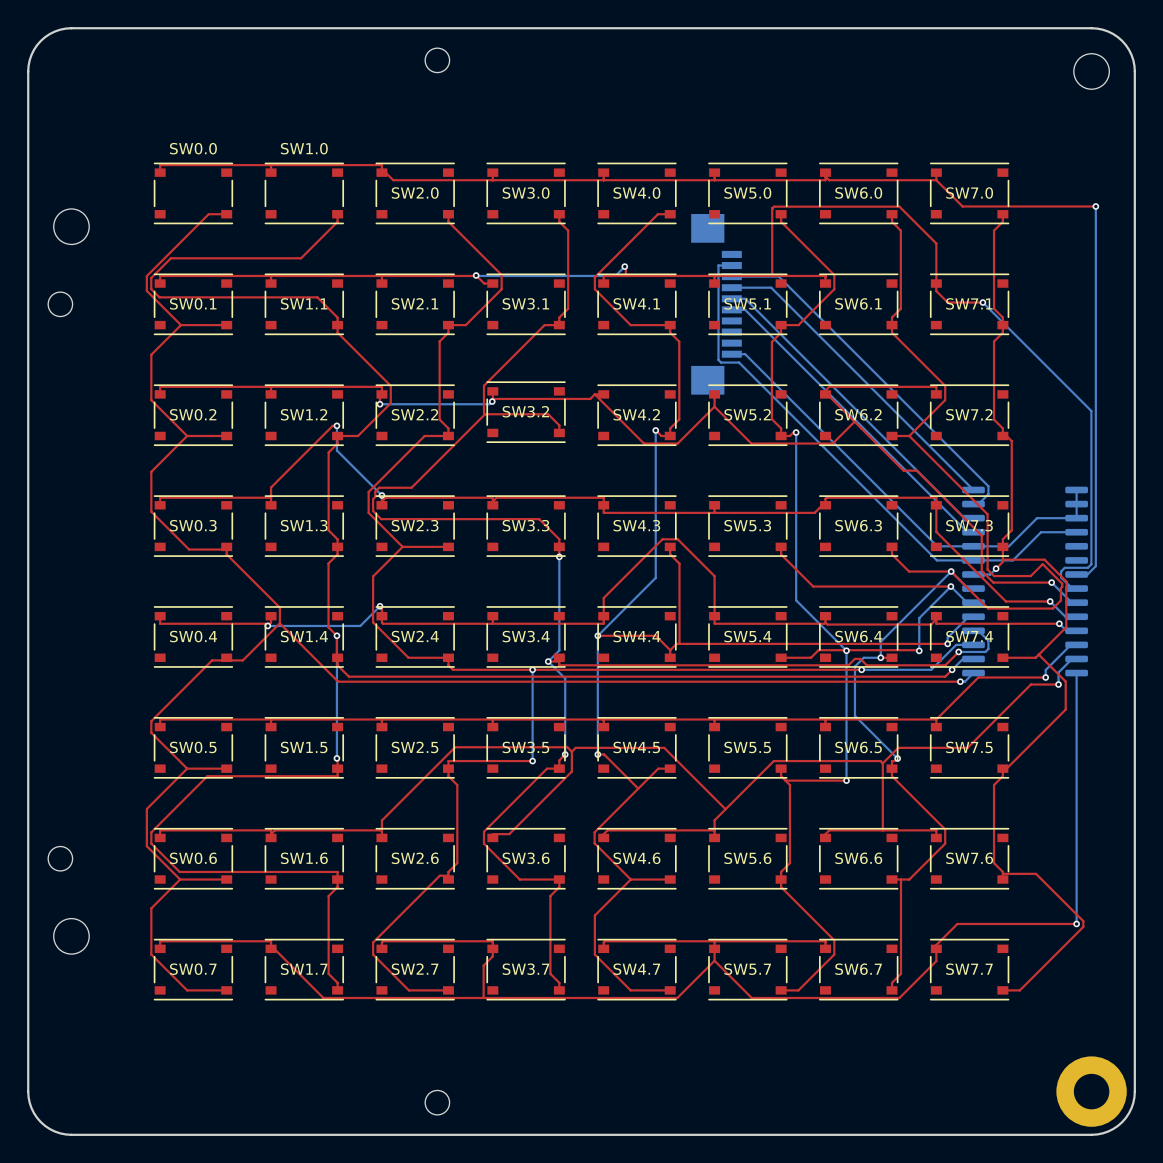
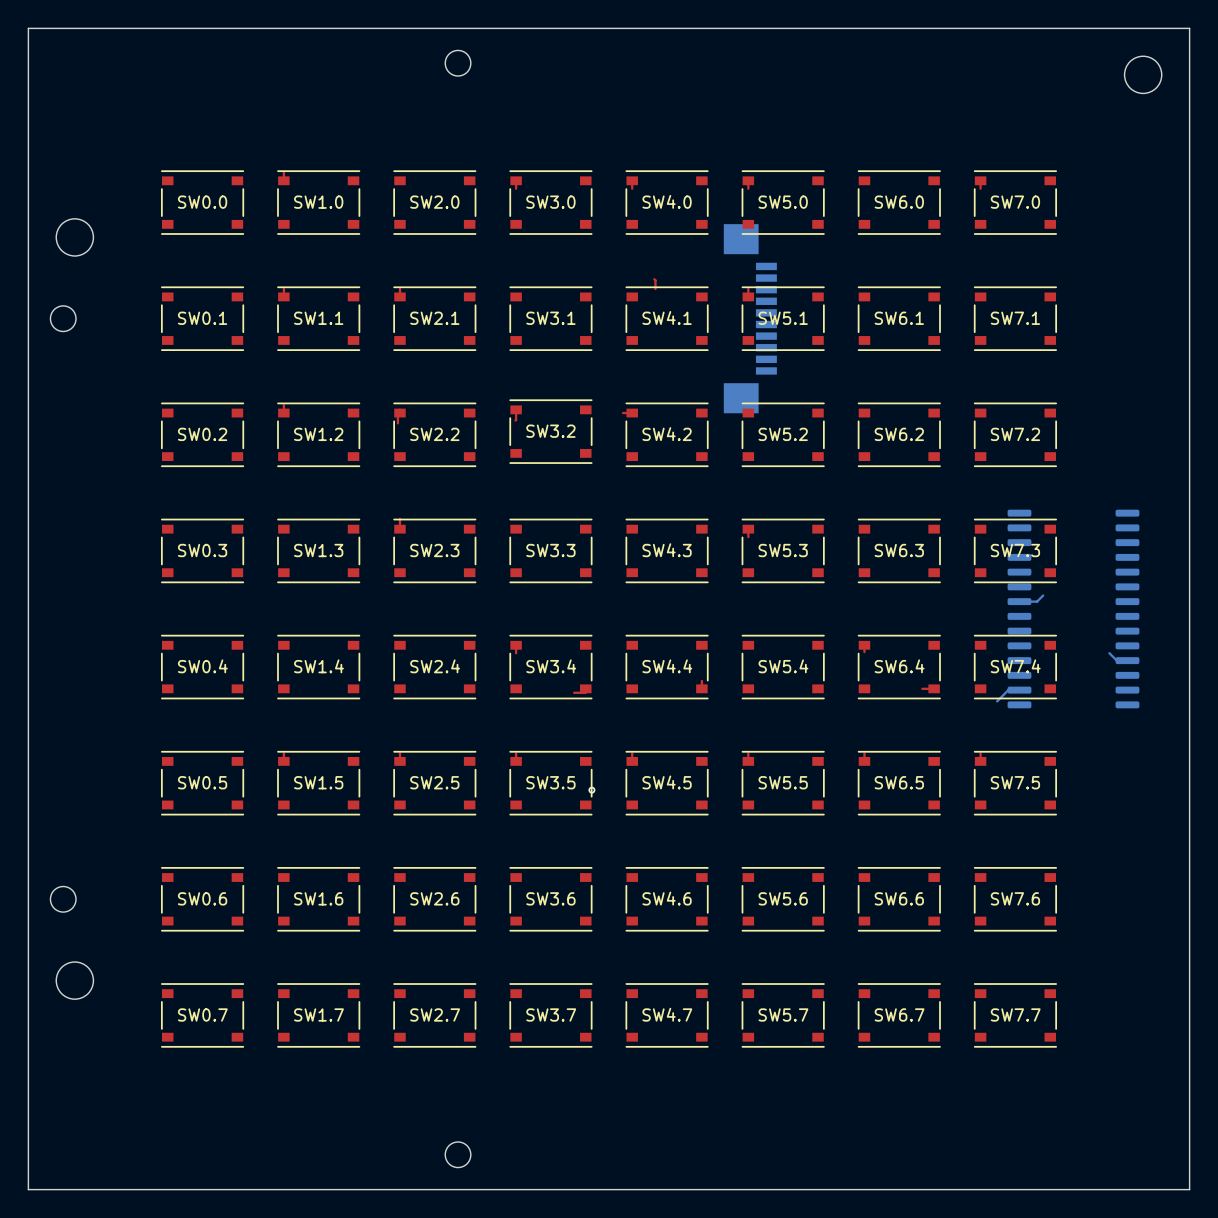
board edge: (71, 28) (1091, 28) (1108, 31) (1122, 40) (1131, 54) (1134, 71) (1134, 1091) (1131, 1108) (1122, 1122) (1108, 1131) (1091, 1134) (71, 1134) (54, 1131) (40, 1122) (31, 1108) (28, 1091) (28, 71) (31, 54) (40, 40) (54, 31) (71, 28) -> (28, 28) (28, 1189) (1189, 1189) (1189, 28) (28, 28)
SW0.0 name position: SW0.0 (193, 148) -> SW0.0 (202, 202)
SW1.0 name position: SW1.0 (304, 148) -> SW1.0 (318, 202)
top track: (381, 168) (393, 180) (825, 180) (825, 172) -> none
top track: (160, 172) (160, 165) (381, 165) (381, 172) -> none
top track: (825, 176) (829, 180) (936, 180) (962, 206) (1095, 206) -> none
bottom track: (1095, 206) (1095, 566) (1087, 574) (1076, 574) -> none
via: (1095, 206) -> none
top track: (226, 214) (208, 214) (146, 276) (146, 290) (180, 325) -> none
top track: (337, 214) (337, 221) (301, 258) (170, 258) (151, 277) (151, 289) (159, 297) (317, 297) (337, 317) (337, 332) (390, 385) (390, 403) (358, 435) (337, 435) (337, 443) (328, 452) (328, 530) (337, 539) (337, 554) (328, 563) (328, 627) (336, 635) (337, 661) -> none
top track: (448, 214) (448, 221) (501, 274) (501, 289) (465, 325) (448, 325) (448, 332) (439, 341) (439, 419) (448, 428) (448, 435) (424, 435) (368, 491) (368, 512) (402, 546) -> none
top track: (559, 214) (559, 221) (568, 230) (568, 308) (559, 317) (559, 325) (544, 325) (483, 385) (485, 414) -> none
top track: (670, 214) (657, 214) (594, 277) (594, 289) (630, 325) (670, 325) (670, 332) (679, 341) (679, 419) (670, 428) (670, 435) (661, 435) (655, 430) -> none
top track: (781, 214) (781, 221) (834, 274) (834, 289) (798, 325) (781, 325) (781, 332) (771, 341) (771, 419) (781, 428) (781, 435) (789, 435) (796, 432) -> none
top track: (892, 214) (892, 221) (900, 230) (900, 308) (892, 317) (892, 332) (945, 385) (945, 400) (909, 435) -> none
top track: (1002, 214) (1002, 221) (994, 230) (994, 308) (1002, 317) (1002, 332) (994, 341) (994, 419) (1002, 428) (1002, 435) -> none
bottom track: (731, 265) (718, 265) (718, 360) (721, 362) (739, 362) (936, 560) (1012, 560) (1041, 532) (1076, 532) -> none
bottom track: (624, 266) (615, 275) (476, 275) -> none
via: (624, 266) -> none
via: (476, 275) -> none
top track: (772, 275) (772, 208) (774, 206) (899, 206) (936, 243) (936, 291) (947, 302) (982, 302) -> none
bottom track: (731, 276) (778, 276) (988, 486) (988, 494) (978, 504) (973, 504) -> none
top track: (160, 283) (160, 275) (476, 275) (484, 283) (492, 283) -> none
top track: (603, 283) (604, 275) (825, 275) (825, 283) -> none
bottom track: (731, 287) (771, 287) (973, 489) -> none
bottom track: (731, 298) (745, 298) (964, 518) (973, 518) -> none
bottom track: (982, 302) (1091, 411) (1091, 564) (1087, 567) (1064, 567) (1061, 571) (1061, 577) (1072, 588) (1076, 588) -> none
via: (982, 302) -> none
bottom track: (731, 309) (745, 309) (967, 532) (973, 532) -> none
top track: (180, 325) (151, 354) (151, 400) (187, 435) -> none
top track: (180, 325) (226, 325) -> none
bottom track: (731, 354) (745, 354) (937, 546) (1008, 546) (1037, 518) (1076, 518) (1076, 489) -> none
top track: (825, 392) (854, 421) -> none
top track: (160, 394) (160, 386) (381, 386) (381, 394) -> none
top track: (714, 394) (714, 406) -> none
top track: (825, 394) (825, 390) (829, 386) (936, 386) (936, 394) -> none
top track: (492, 398) (590, 398) (594, 394) (644, 443) (677, 443) (714, 406) -> none
bottom track: (492, 401) (489, 404) (379, 404) -> none
via: (492, 401) -> none
via: (379, 404) -> none
top track: (714, 406) (751, 443) (832, 443) (854, 421) -> none
top track: (485, 414) (548, 414) (559, 425) (559, 432) -> none
top track: (485, 414) (411, 487) (379, 487) (375, 491) (373, 499) (373, 511) (381, 519) (539, 519) (559, 539) (559, 556) -> none
top track: (854, 421) (903, 470) (916, 470) (981, 535) (981, 570) (993, 582) (1051, 582) -> none
top track: (336, 425) (332, 425) (271, 487) (271, 505) -> none
bottom track: (336, 425) (336, 450) (381, 495) -> none
via: (336, 425) -> none
bottom track: (655, 430) (655, 577) (597, 635) (597, 754) -> none
via: (655, 430) -> none
bottom track: (796, 432) (796, 600) (846, 650) (846, 780) -> none
via: (796, 432) -> none
top track: (1002, 432) (1011, 441) (1011, 530) (1002, 539) (1002, 561) (996, 568) -> none
top track: (187, 435) (226, 435) -> none
top track: (187, 435) (151, 471) (151, 511) (189, 549) (226, 549) -> none
top track: (892, 435) (909, 435) -> none
top track: (909, 435) (987, 514) (987, 569) (994, 576) (1030, 576) (1043, 564) (1062, 583) (1060, 600) (1052, 608) (988, 608) (951, 571) (909, 571) (892, 554) (892, 546) -> none
via: (381, 495) -> none
top track: (271, 497) (160, 497) (160, 505) -> none
top track: (381, 501) (385, 497) (492, 497) (492, 505) -> none
top track: (492, 501) (496, 497) (603, 497) (603, 512) (814, 512) (825, 502) -> none
top track: (825, 505) (826, 497) (936, 497) (936, 531) (1005, 601) (1050, 601) -> none
top track: (226, 546) (226, 554) (279, 607) (279, 623) -> none
top track: (402, 546) (448, 546) -> none
top track: (402, 546) (373, 576) (373, 622) (408, 657) (448, 657) (448, 665) (452, 669) (861, 669) -> none
top track: (670, 546) (670, 554) (679, 563) (679, 643) -> none
top track: (781, 546) (781, 554) (813, 586) (950, 586) -> none
bottom track: (559, 556) (559, 650) (548, 661) (565, 678) (565, 754) -> none
via: (559, 556) -> none
top track: (1002, 559) (1044, 559) (1066, 581) (1066, 627) (1035, 657) (1002, 657) -> none
via: (996, 568) -> none
via: (951, 571) -> none
bottom track: (1051, 582) (1071, 602) (1076, 602) -> none
via: (1051, 582) -> none
via: (950, 586) -> none
bottom track: (973, 588) (968, 588) (951, 571) (880, 641) (880, 657) (863, 657) (854, 666) (854, 715) (897, 758) -> none
bottom track: (1050, 601) (1065, 616) (1076, 616) -> none
via: (1050, 601) -> none
bottom track: (973, 602) (967, 602) (950, 586) (919, 618) (919, 650) -> none
top track: (380, 606) (381, 608) (383, 623) (603, 623) (603, 598) (662, 539) (677, 539) (714, 576) (714, 623) (825, 622) (827, 624) (931, 624) (936, 619) -> none
bottom track: (380, 606) (360, 625) (267, 625) -> none
via: (380, 606) -> none
top track: (160, 616) (160, 623) (269, 623) (271, 616) -> none
top track: (936, 616) (936, 623) (1059, 623) -> none
bottom track: (973, 616) (968, 616) (947, 637) (947, 643) -> none
top track: (279, 623) (338, 681) (960, 681) -> none
top track: (279, 623) (242, 660) (212, 660) (151, 721) (151, 732) (187, 768) -> none
via: (1059, 623) -> none
via: (267, 625) -> none
bottom track: (973, 630) (978, 630) (988, 640) (988, 648) (985, 651) (958, 651) -> none
bottom track: (336, 635) (336, 758) -> none
via: (336, 635) -> none
top track: (597, 635) (655, 635) (670, 650) (676, 643) (947, 643) -> none
via: (597, 635) -> none
via: (947, 643) -> none
bottom track: (973, 644) (956, 644) (931, 669) (861, 669) -> none
bottom track: (1076, 644) (1070, 644) (1045, 670) (1045, 677) -> none
via: (846, 650) -> none
top track: (919, 650) (818, 650) (811, 657) -> none
via: (919, 650) -> none
top track: (958, 651) (945, 665) (866, 665) (860, 658) (854, 658) (848, 665) (559, 665) (559, 657) -> none
via: (958, 651) -> none
top track: (1038, 654) (1065, 681) (1065, 709) (1002, 772) -> none
top track: (337, 657) (337, 665) (348, 676) (945, 676) (952, 669) -> none
top track: (781, 657) (811, 657) -> none
via: (880, 657) -> none
bottom track: (1076, 658) (1072, 658) (1058, 672) (1058, 684) -> none
via: (548, 661) -> none
bottom track: (532, 669) (532, 761) -> none
via: (532, 669) -> none
via: (861, 669) -> none
via: (952, 669) -> none
bottom track: (973, 673) (964, 681) (960, 681) -> none
bottom track: (1076, 673) (1076, 923) -> none
top track: (1045, 677) (978, 677) (936, 719) (160, 719) (160, 727) -> none
via: (1045, 677) -> none
via: (960, 681) -> none
top track: (1058, 684) (1030, 684) (967, 747) (898, 747) (882, 763) -> none
via: (1058, 684) -> none
top track: (571, 751) (575, 747) (664, 747) (725, 809) -> none
top track: (571, 751) (567, 747) (455, 747) (381, 820) (381, 837) -> none
top track: (571, 751) (571, 771) (509, 834) (492, 834) (492, 837) -> none
top track: (565, 754) (559, 760) (559, 768) (547, 768) (483, 831) (483, 843) (519, 879) (559, 879) (559, 887) (550, 896) (550, 973) (559, 982) (559, 990) -> none
top track: (597, 754) (604, 754) (638, 788) -> none
via: (597, 754) -> none
top track: (336, 758) (337, 776) (207, 776) (151, 832) (151, 843) (179, 871) (337, 871) (337, 887) (328, 896) (328, 973) (337, 982) (337, 990) -> none
via: (336, 758) -> none
top track: (897, 758) (892, 761) (892, 776) (945, 829) (945, 843) (909, 879) (892, 879) -> none
via: (897, 758) -> none
top track: (532, 761) (448, 761) (448, 776) (457, 785) (457, 863) (448, 871) (448, 879) -> none
via: (532, 761) -> none
top track: (882, 763) (882, 830) -> none
top track: (882, 763) (880, 761) (773, 761) (714, 820) (714, 837) -> none
top track: (187, 768) (226, 768) -> none
top track: (187, 768) (146, 808) (146, 846) (180, 879) -> none
top track: (670, 768) (658, 768) (594, 832) (594, 843) (630, 879) -> none
top track: (781, 768) (781, 776) (789, 785) (789, 863) (781, 871) (781, 887) (834, 940) (834, 954) (798, 990) (781, 990) -> none
top track: (1002, 768) (1002, 776) (994, 785) (994, 863) (1002, 871) (1002, 879) -> none
top track: (785, 780) (846, 780) -> none
via: (846, 780) -> none
top track: (381, 830) (274, 830) (271, 834) -> none
top track: (714, 830) (607, 830) (603, 834) (603, 837) -> none
top track: (160, 837) (160, 830) (271, 830) (271, 837) -> none
top track: (825, 837) (825, 834) (829, 830) (936, 830) (936, 837) -> none
top track: (1002, 873) (1036, 873) (1083, 921) (1083, 926) (1019, 990) (1002, 990) -> none
top track: (448, 875) (439, 875) (373, 942) (373, 954) (408, 990) (448, 990) -> none
top track: (180, 879) (151, 908) (151, 954) (187, 990) (226, 990) -> none
top track: (180, 879) (226, 879) -> none
top track: (630, 879) (670, 879) -> none
top track: (630, 879) (594, 915) (594, 954) (630, 990) (670, 990) -> none
top track: (900, 879) (900, 973) (892, 982) (892, 990) -> none
top track: (1076, 923) (957, 923) (936, 945) (936, 961) (899, 997) (751, 997) (714, 960) -> none
via: (1076, 923) -> none
top track: (714, 941) (714, 960) -> none
top track: (271, 945) (323, 997) (677, 997) (714, 960) -> none
top track: (160, 948) (160, 941) (271, 941) (271, 948) -> none
top track: (381, 948) (383, 941) (492, 941) (492, 956) (483, 965) (483, 997) -> none
top track: (603, 948) (604, 941) (825, 941) (825, 948) -> none
part: (1091, 1091) -> none

